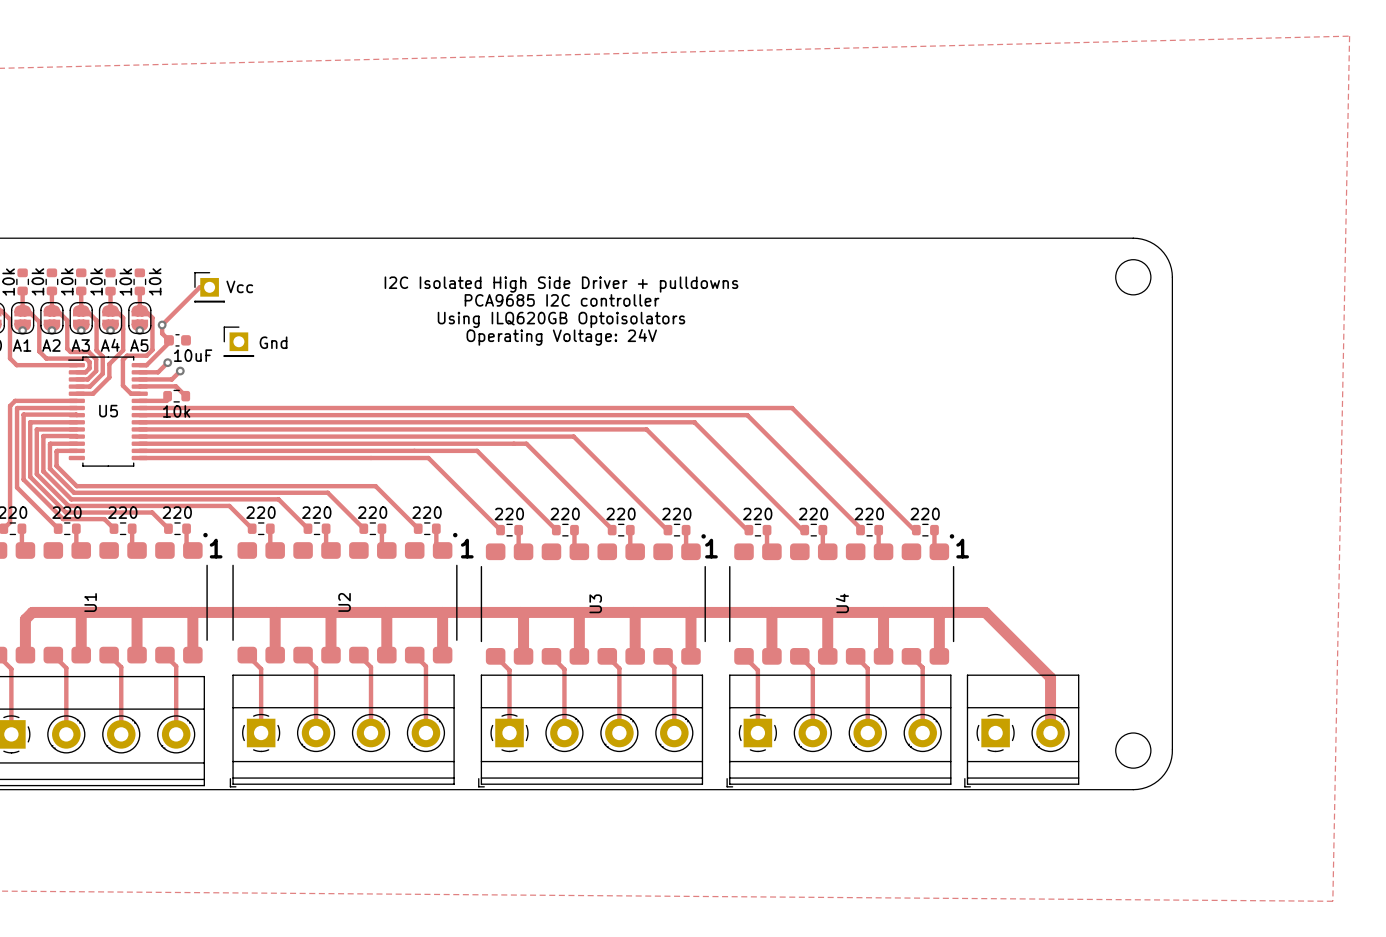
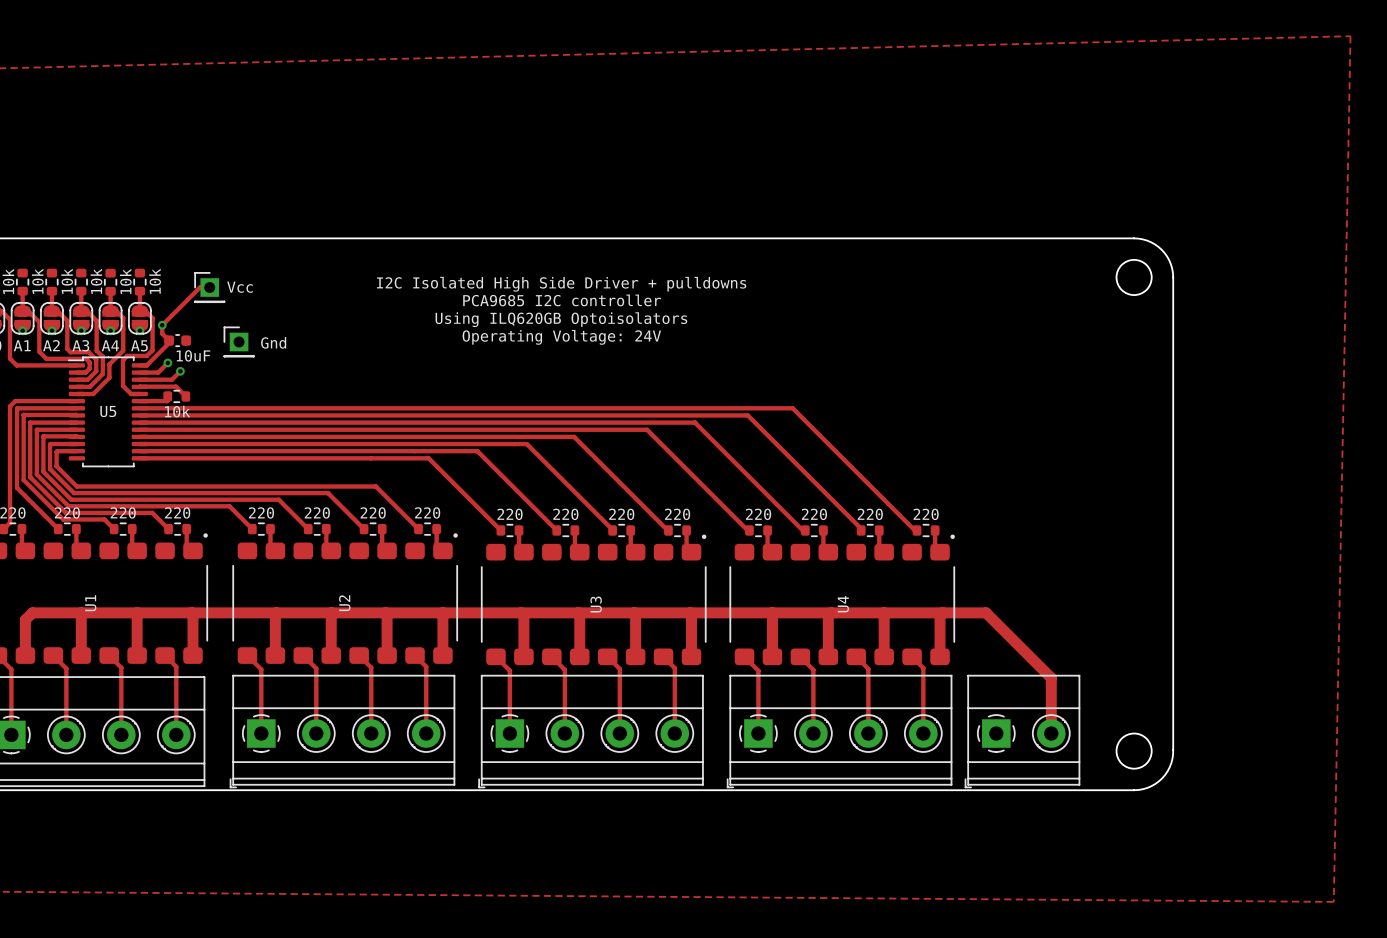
text: 1 (216, 548) -> none
text: 1 (467, 548) -> none
text: 1 (711, 548) -> none
text: 1 (962, 548) -> none

